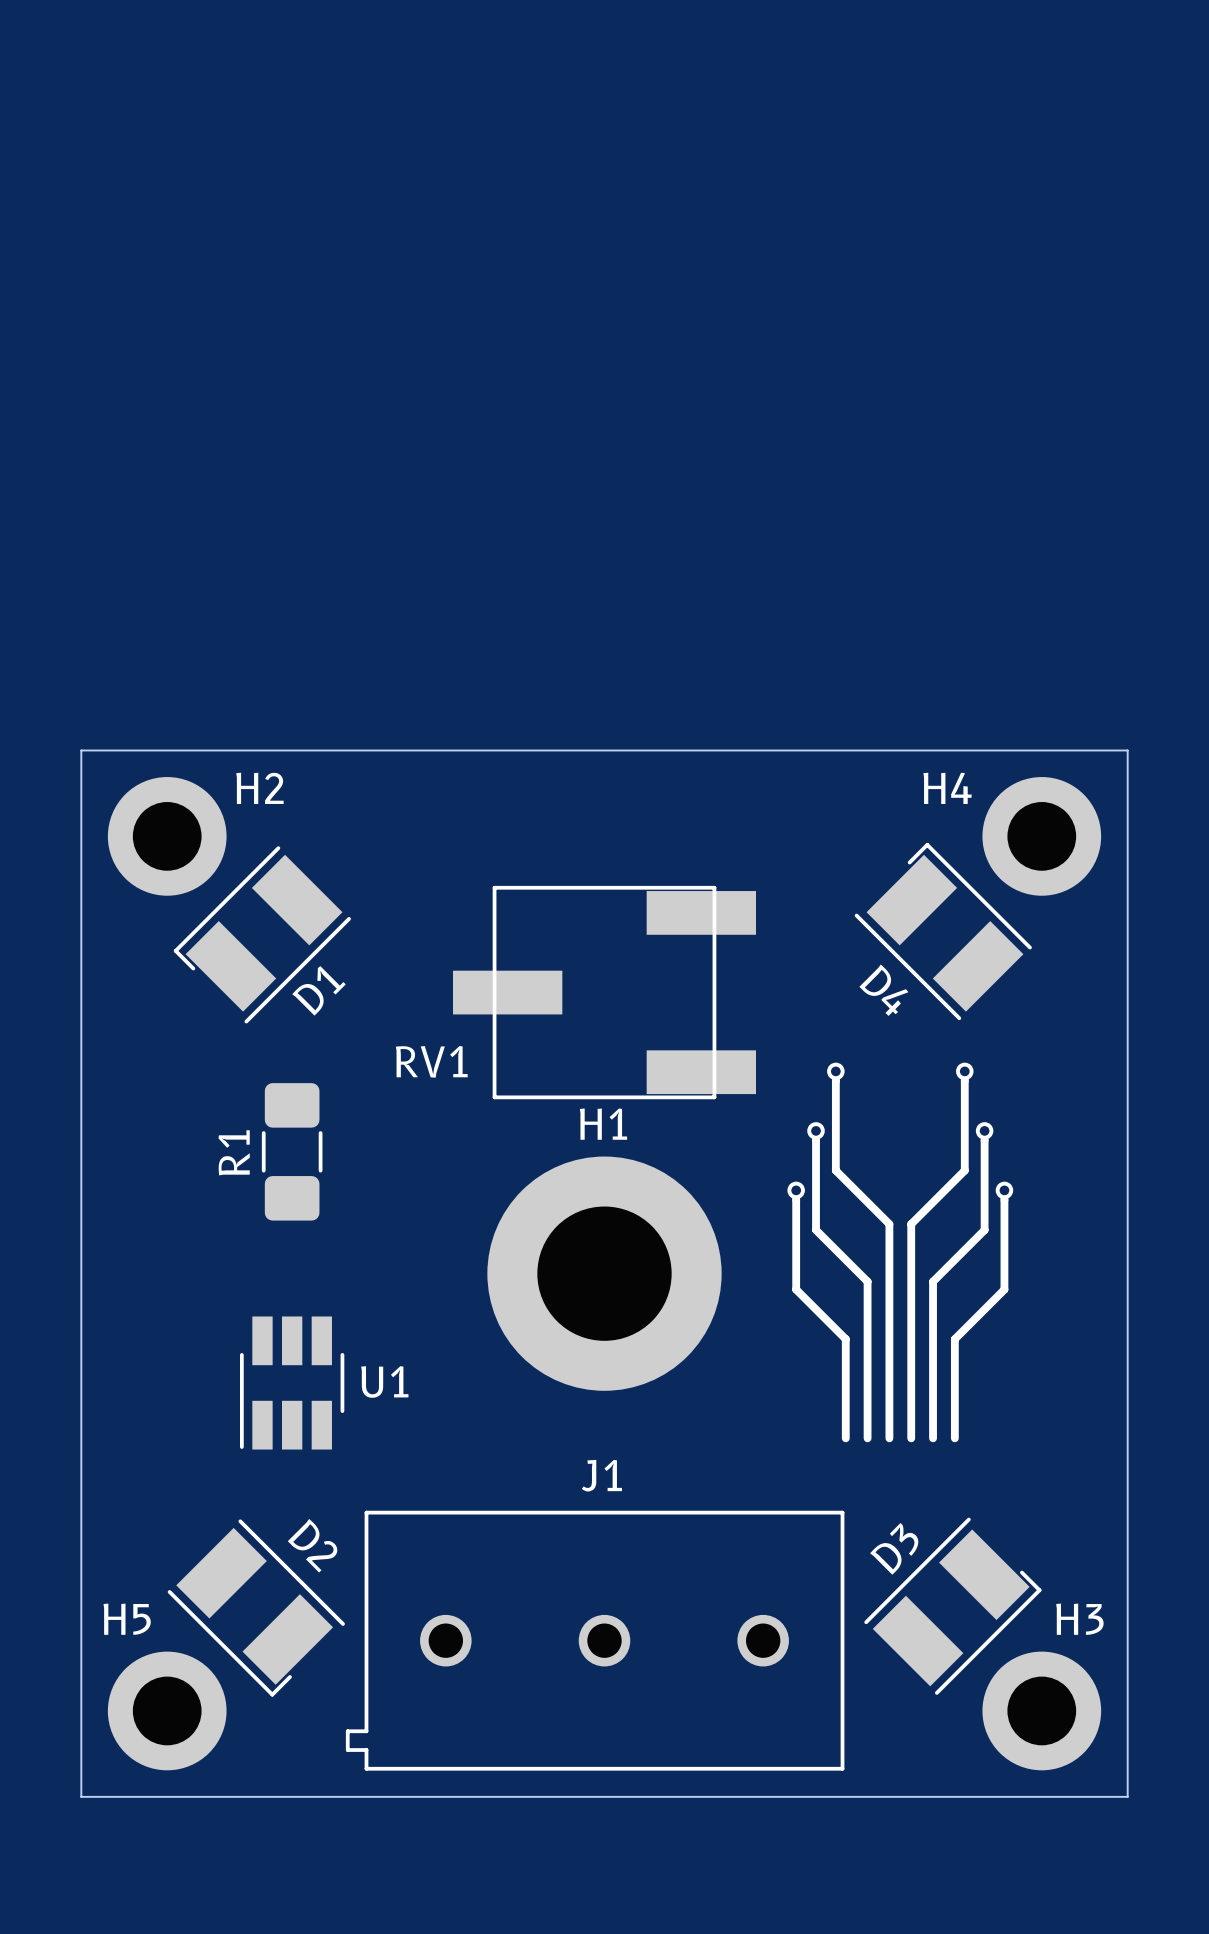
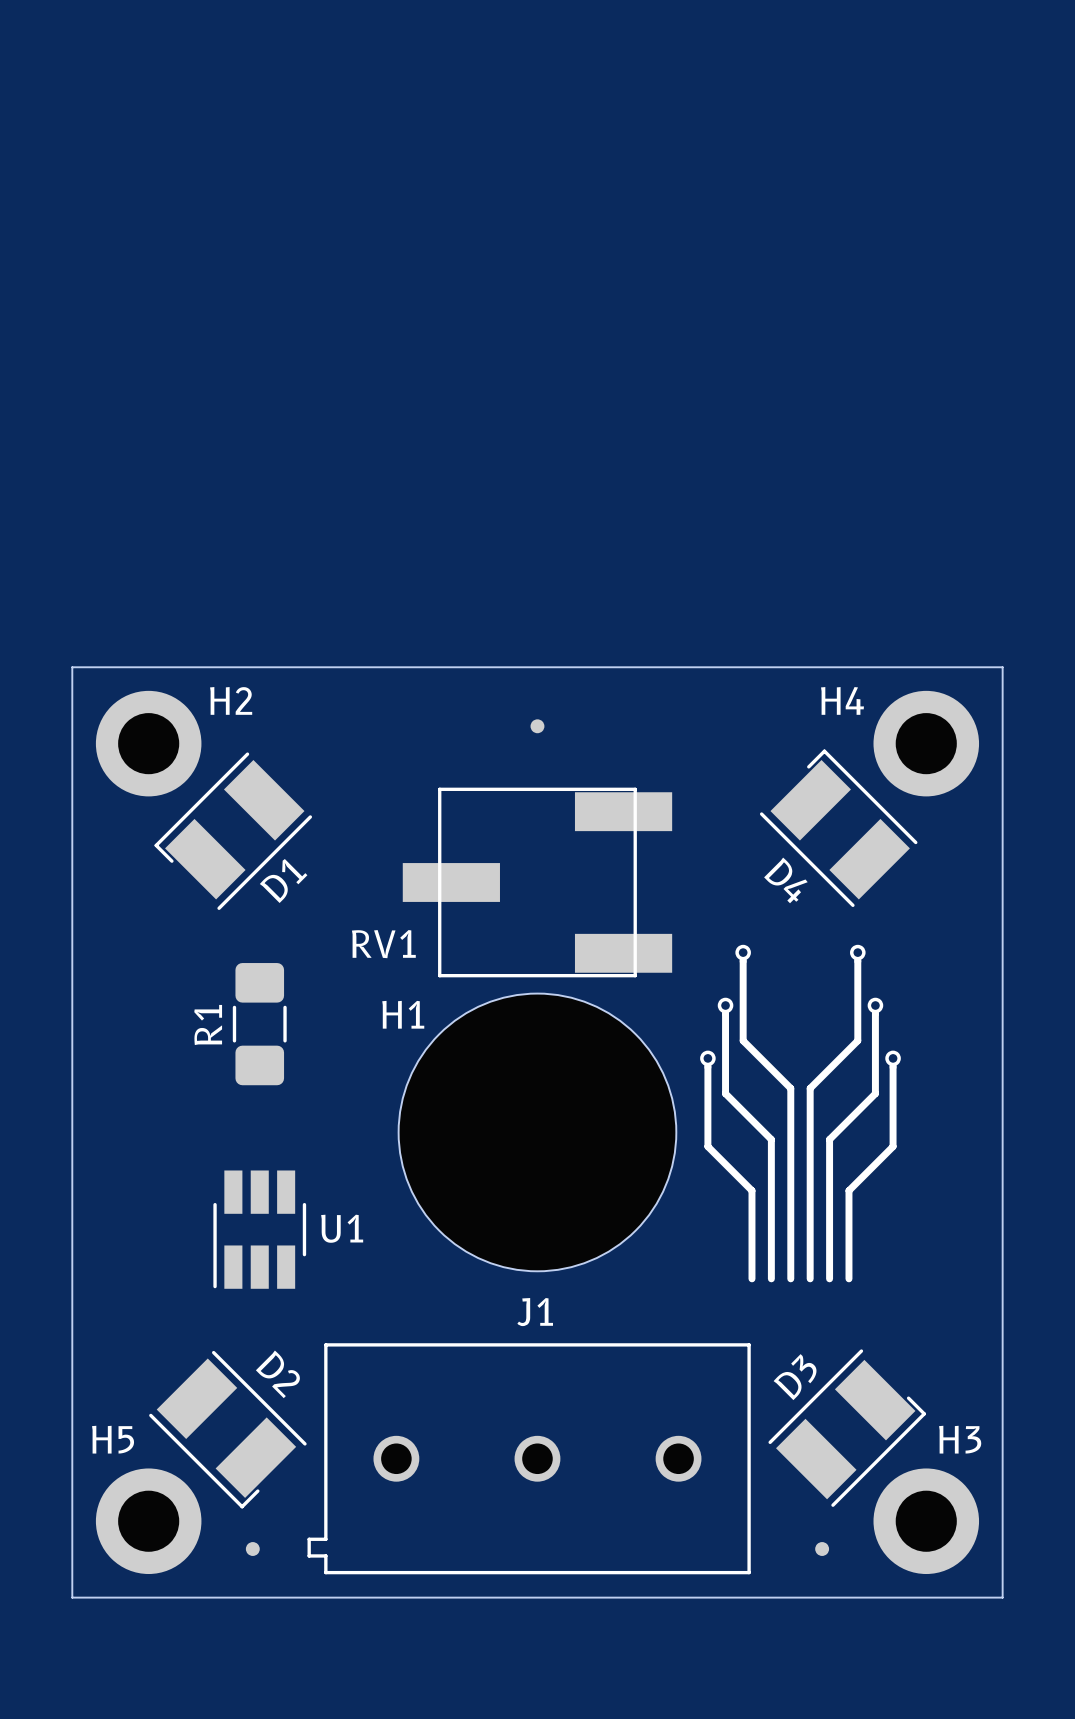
part: none -> (537, 726)
H1 name position: H1 (603, 1124) -> H1 (403, 1014)
H1 footprint: [487, 1156, 722, 1391] -> [398, 993, 677, 1272]
part: none -> (252, 1549)
part: none -> (822, 1549)

